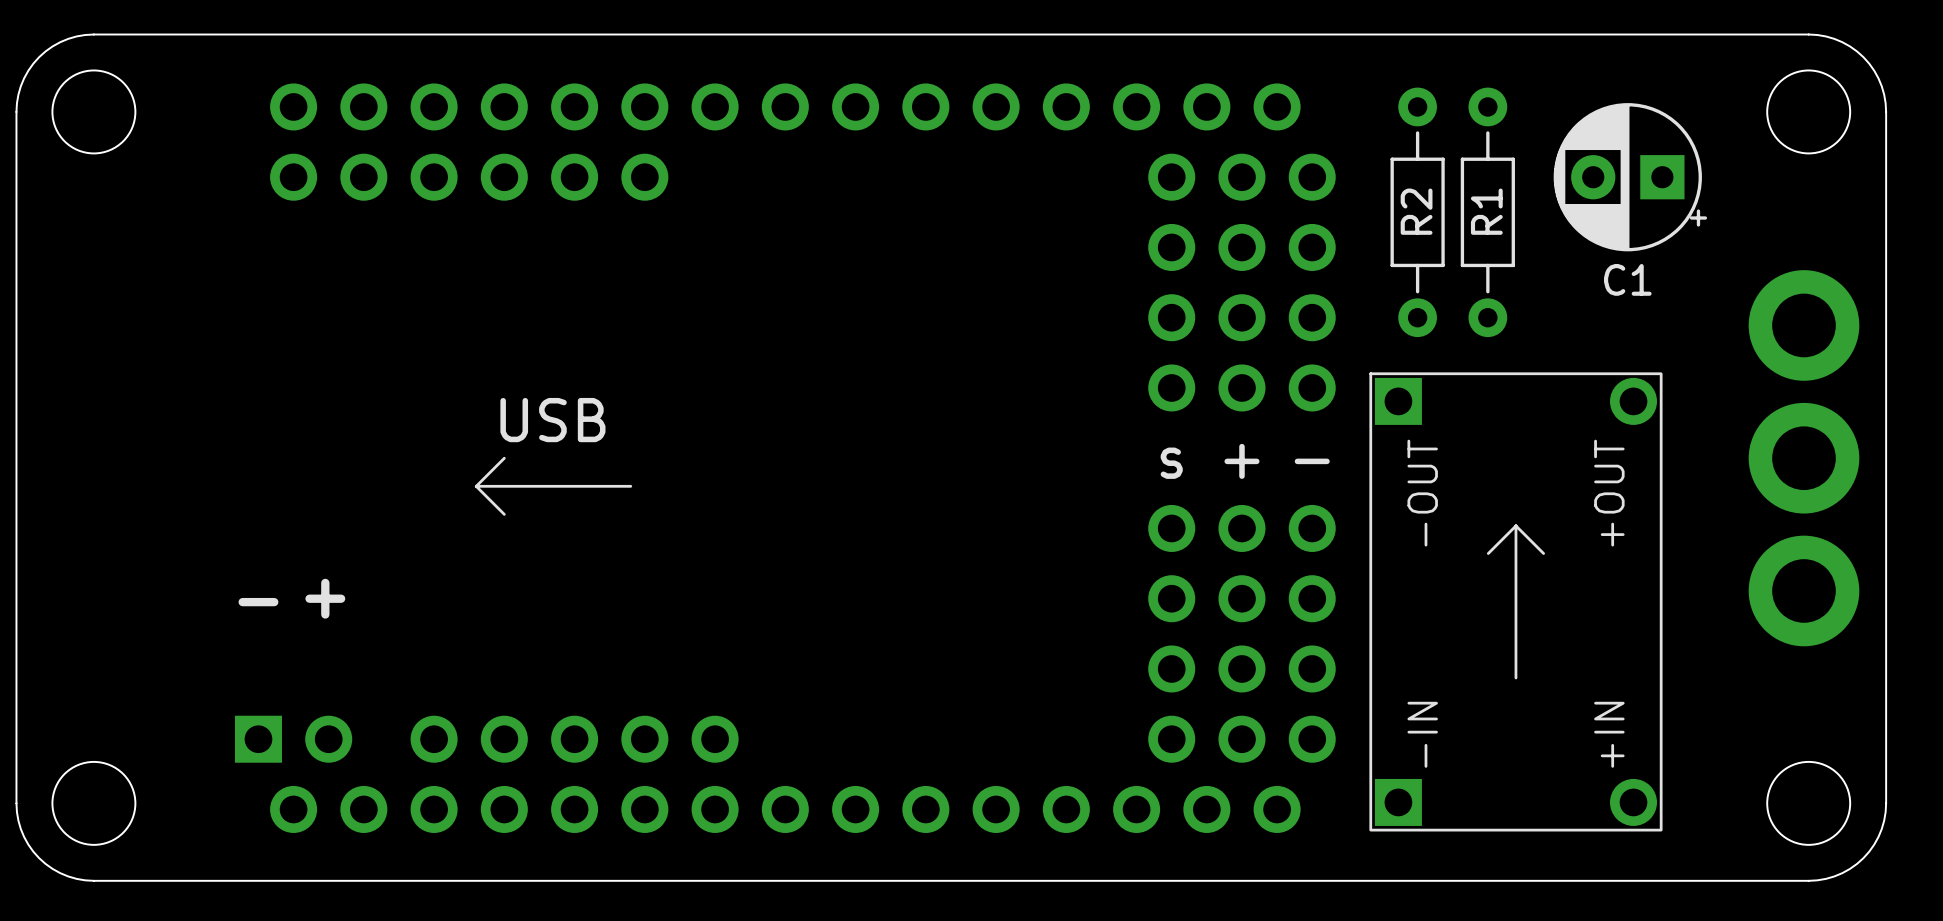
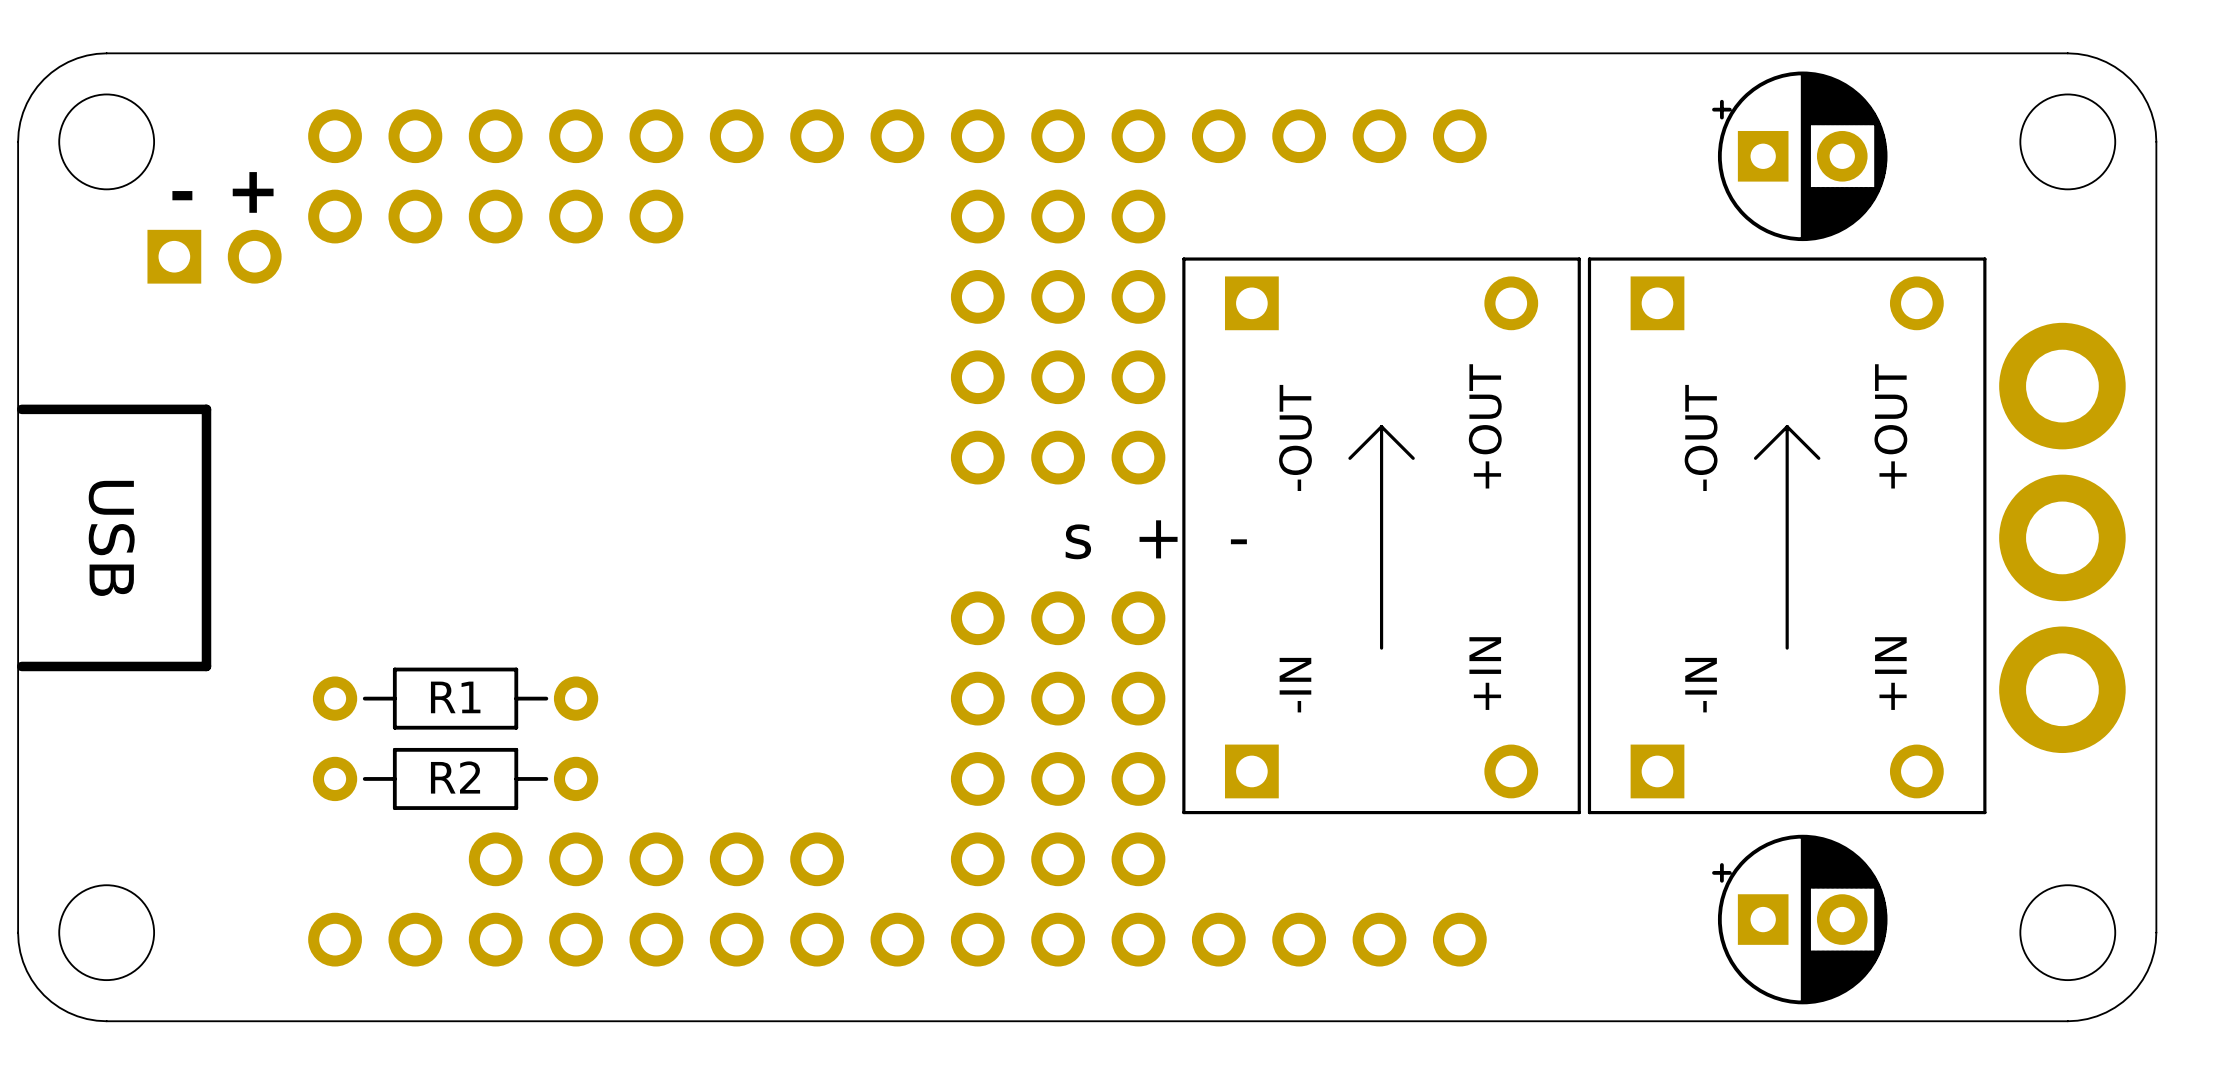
part: none -> (1799, 156)
text: none -> + (253, 192)
text: none -> - (182, 195)
part: (469, 177) -> none
C1: (1630, 177) -> none
R2 rotation: 0° (1417, 212) -> 90° clockwise (455, 778)
R2 position: (1417, 212) -> (455, 778)
R1 rotation: 0° (1487, 212) -> 90° clockwise (455, 698)
R1 position: (1487, 212) -> (455, 698)
part: none -> (977, 337)
part: none -> (1098, 337)
part: (1171, 282) -> none
part: (1277, 282) -> none
line: none -> (21, 409) (206, 409) (206, 666) (21, 666)
text rotation: 0° (552, 420) -> 90° clockwise (111, 538)
text position: USB (552, 420) -> USB (111, 538)
part: none -> (1381, 535)
part: none -> (1787, 535)
line: (504, 458) (476, 486) -> none
text position: + (1241, 461) -> + (1158, 539)
text position: - (1312, 461) -> - (1238, 541)
text position: s (1171, 463) -> s (1078, 541)
line: (476, 486) (504, 514) -> none
line: (476, 486) (630, 486) -> none
text: + (325, 598) -> none
part: (1515, 601) -> none
text: - (258, 602) -> none
part: none -> (977, 738)
part: none -> (1098, 738)
part: (1171, 633) -> none
part: (1277, 633) -> none
part position: (293, 739) -> (214, 256)
part: none -> (1799, 919)

